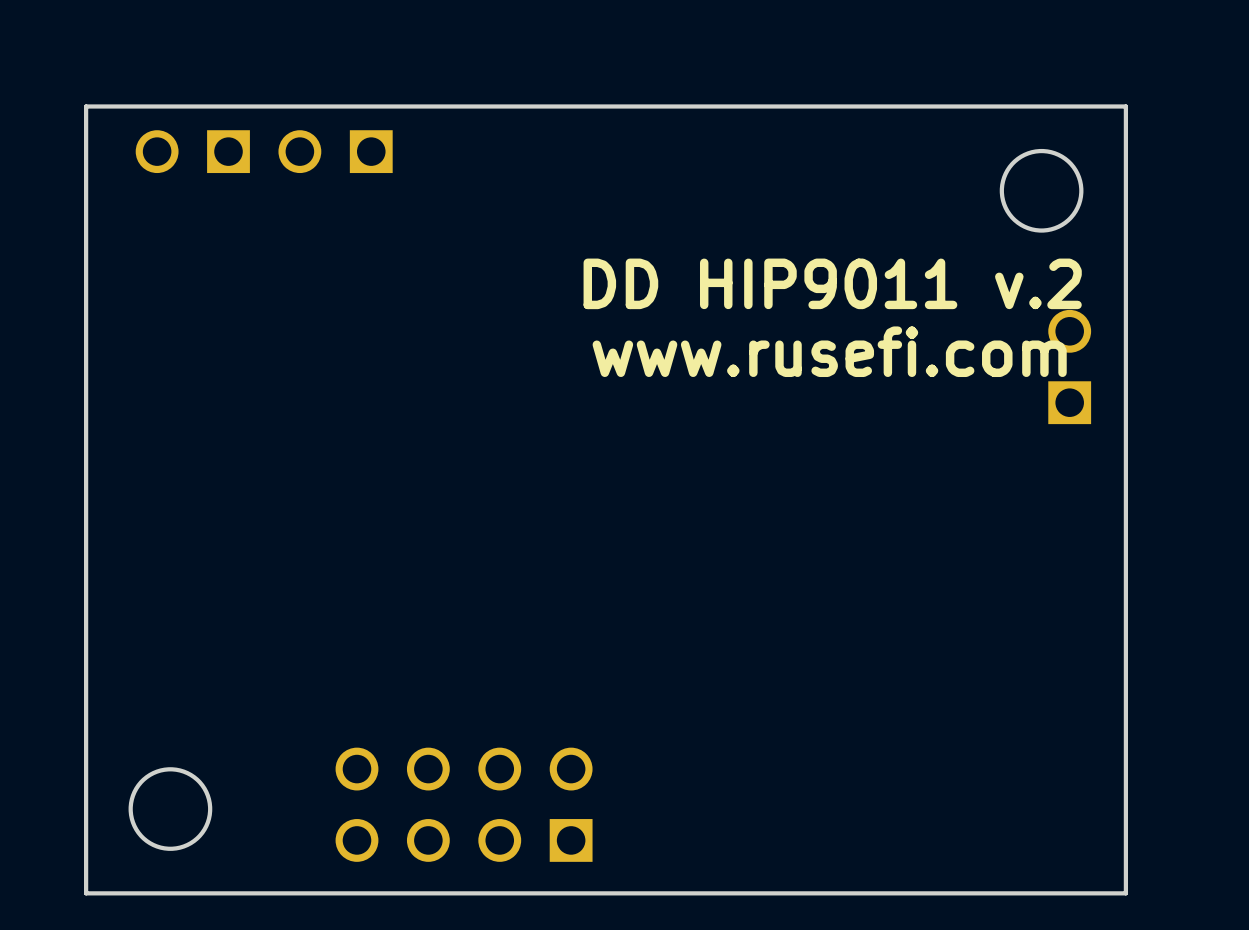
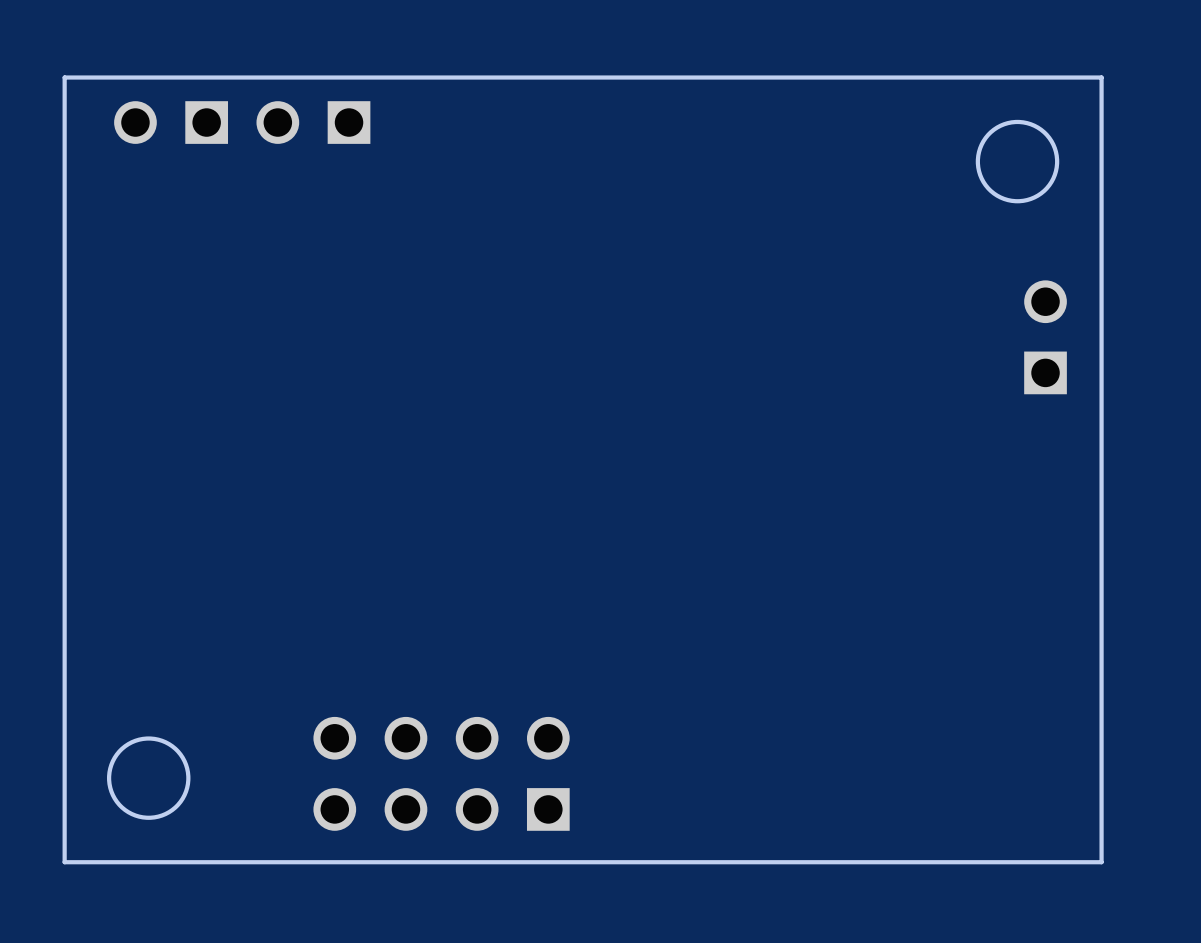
text: DD HIP9011 v.2 (832, 283) -> none
text: www.rusefi.com (829, 351) -> none

